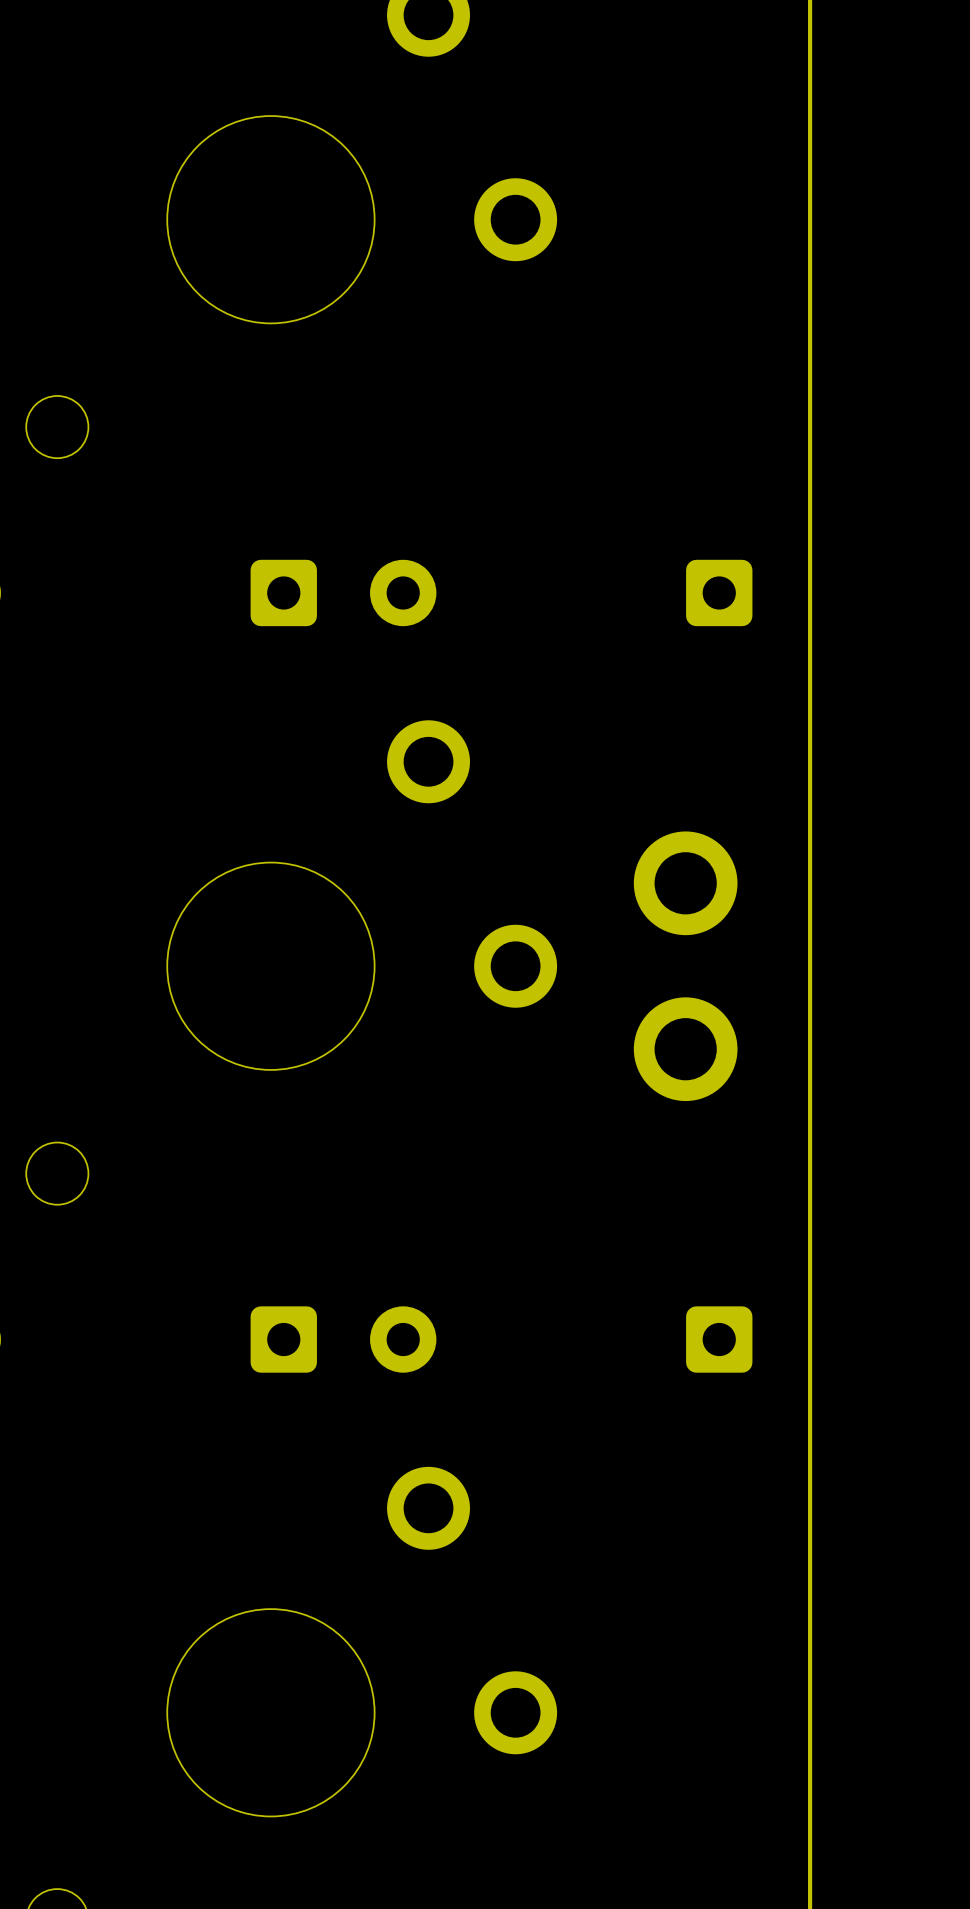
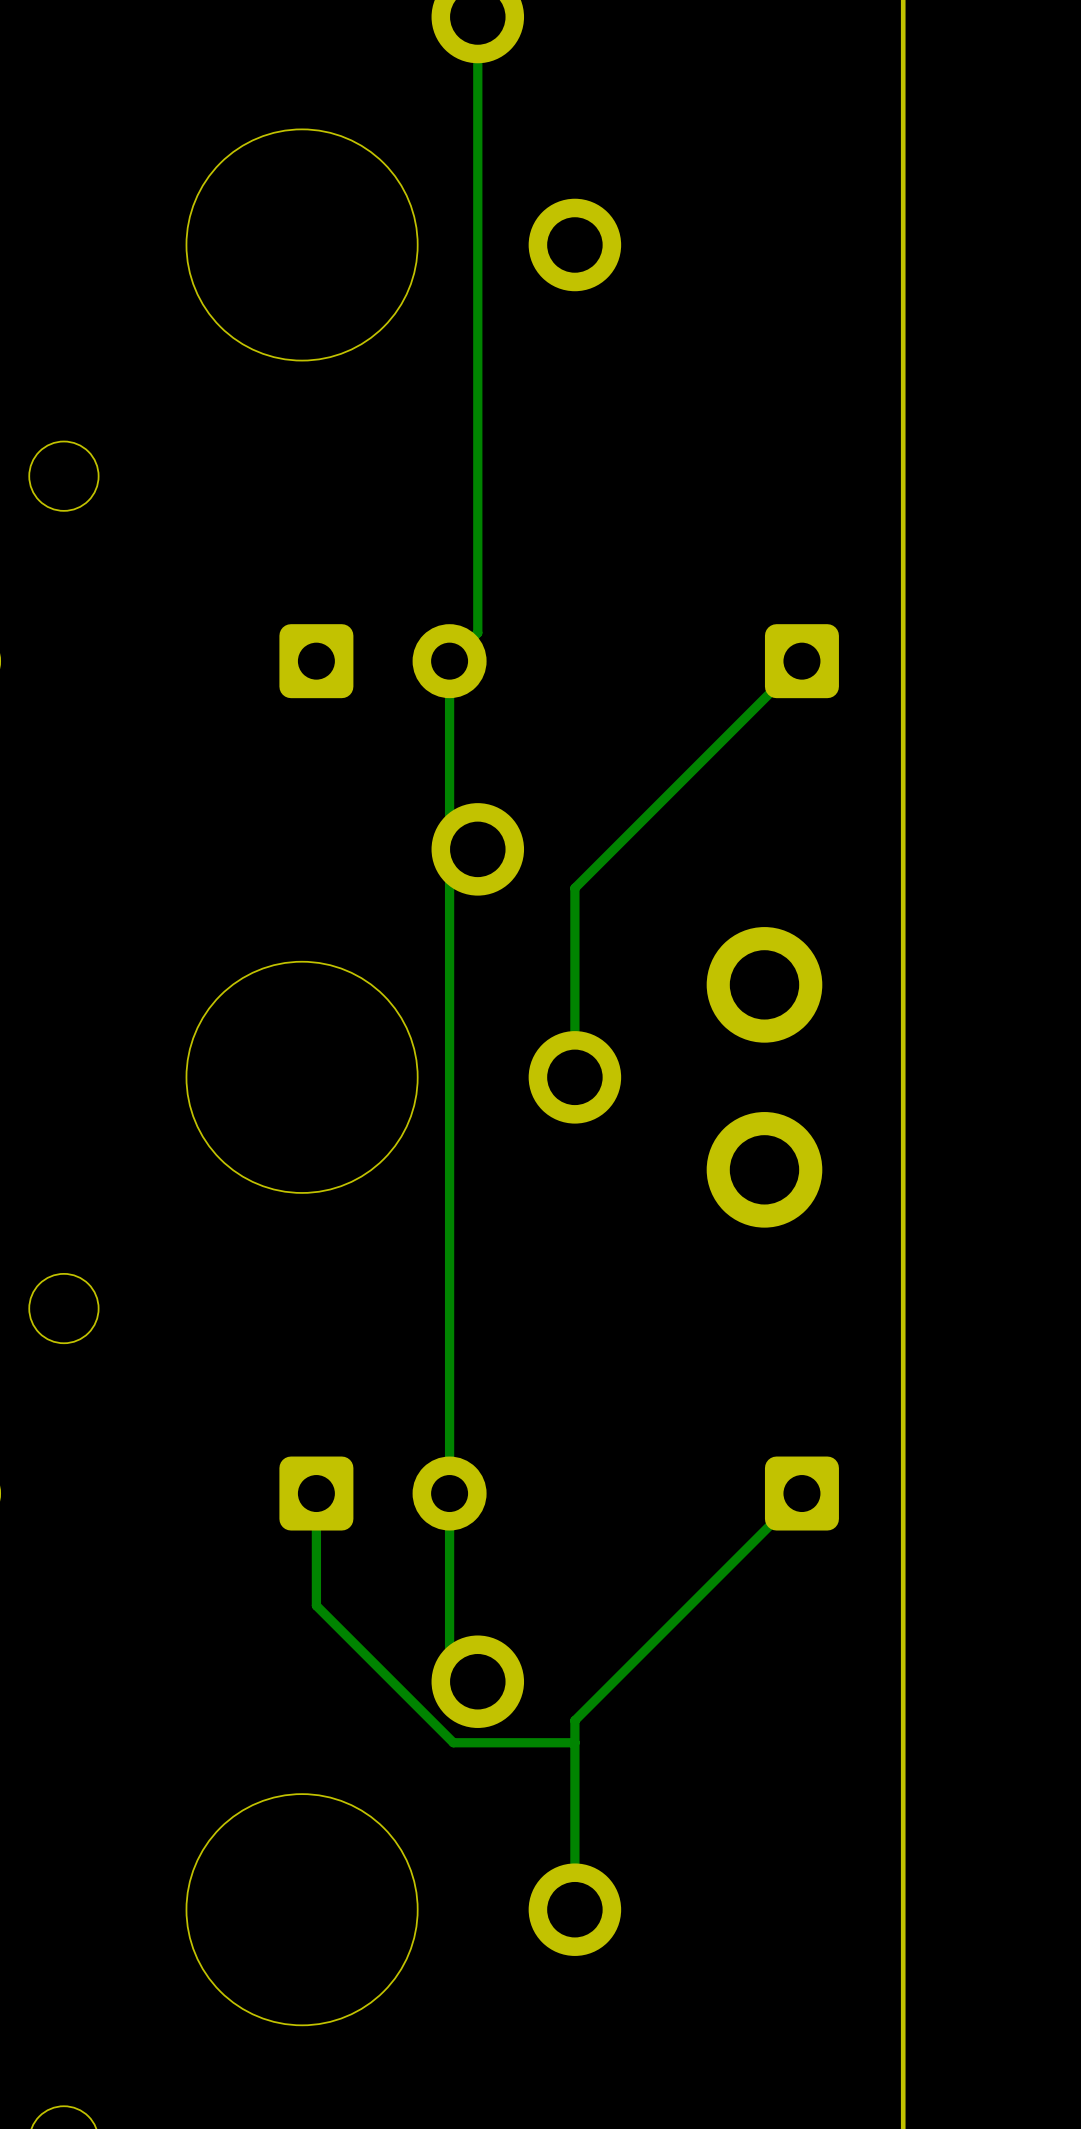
track: none -> (477, 17) (477, 632) (449, 661) (449, 821) (477, 849) (449, 877) (449, 1653) (477, 1681)
track: none -> (801, 661) (574, 888) (574, 1077)
track: none -> (316, 1493) (316, 1605) (453, 1742) (574, 1742)
track: none -> (801, 1493) (574, 1720) (574, 1909)

